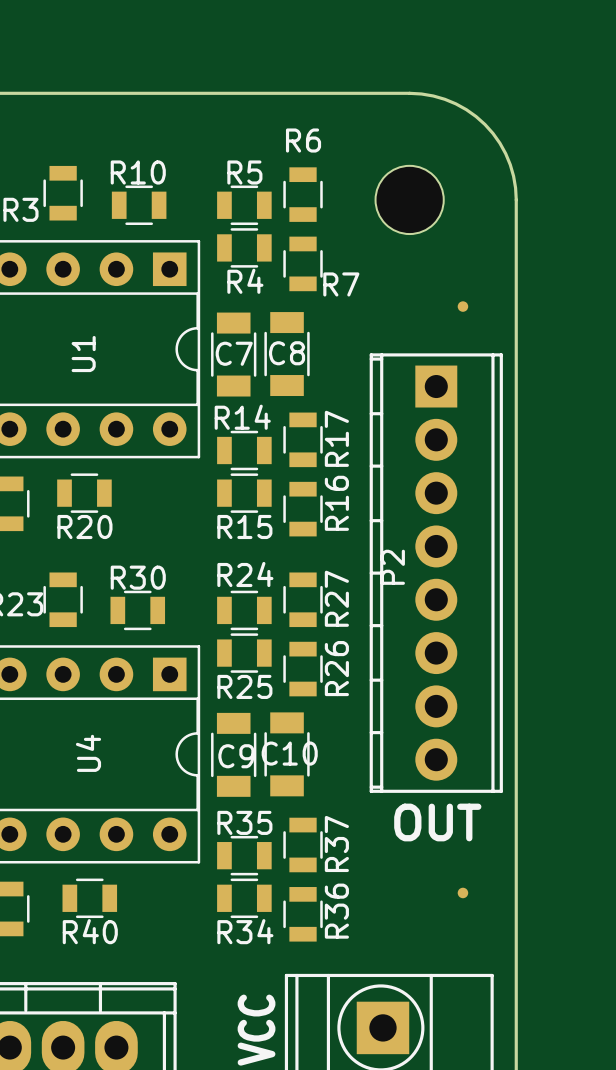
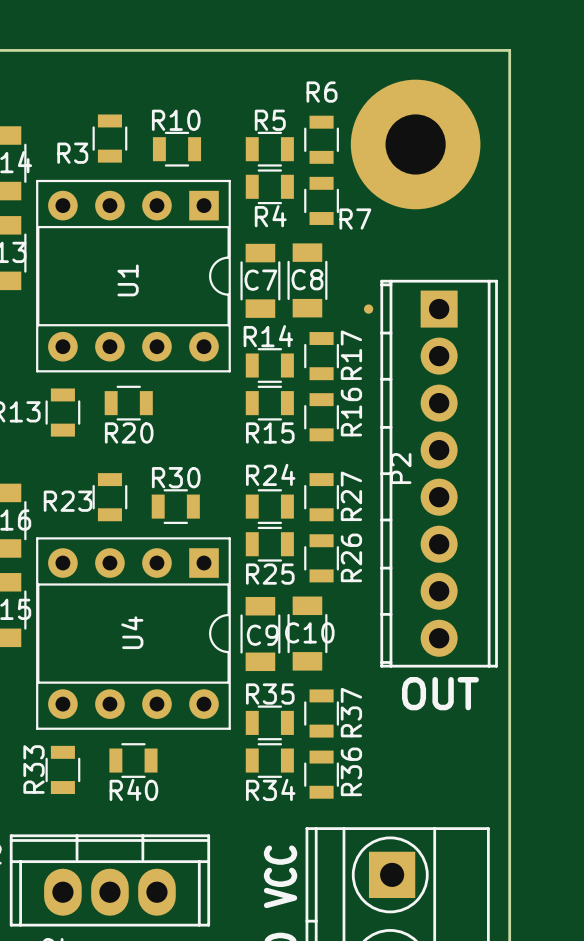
board edge: (409, 93) (433, 95) (455, 103) (485, 124) (499, 143) (510, 164) (516, 199) -> (415, 50) (509, 50) (509, 144)
part footprint: [375, 165, 444, 235] -> [350, 79, 481, 210]
part position: (462, 306) -> (368, 309)
part: (462, 892) -> none

